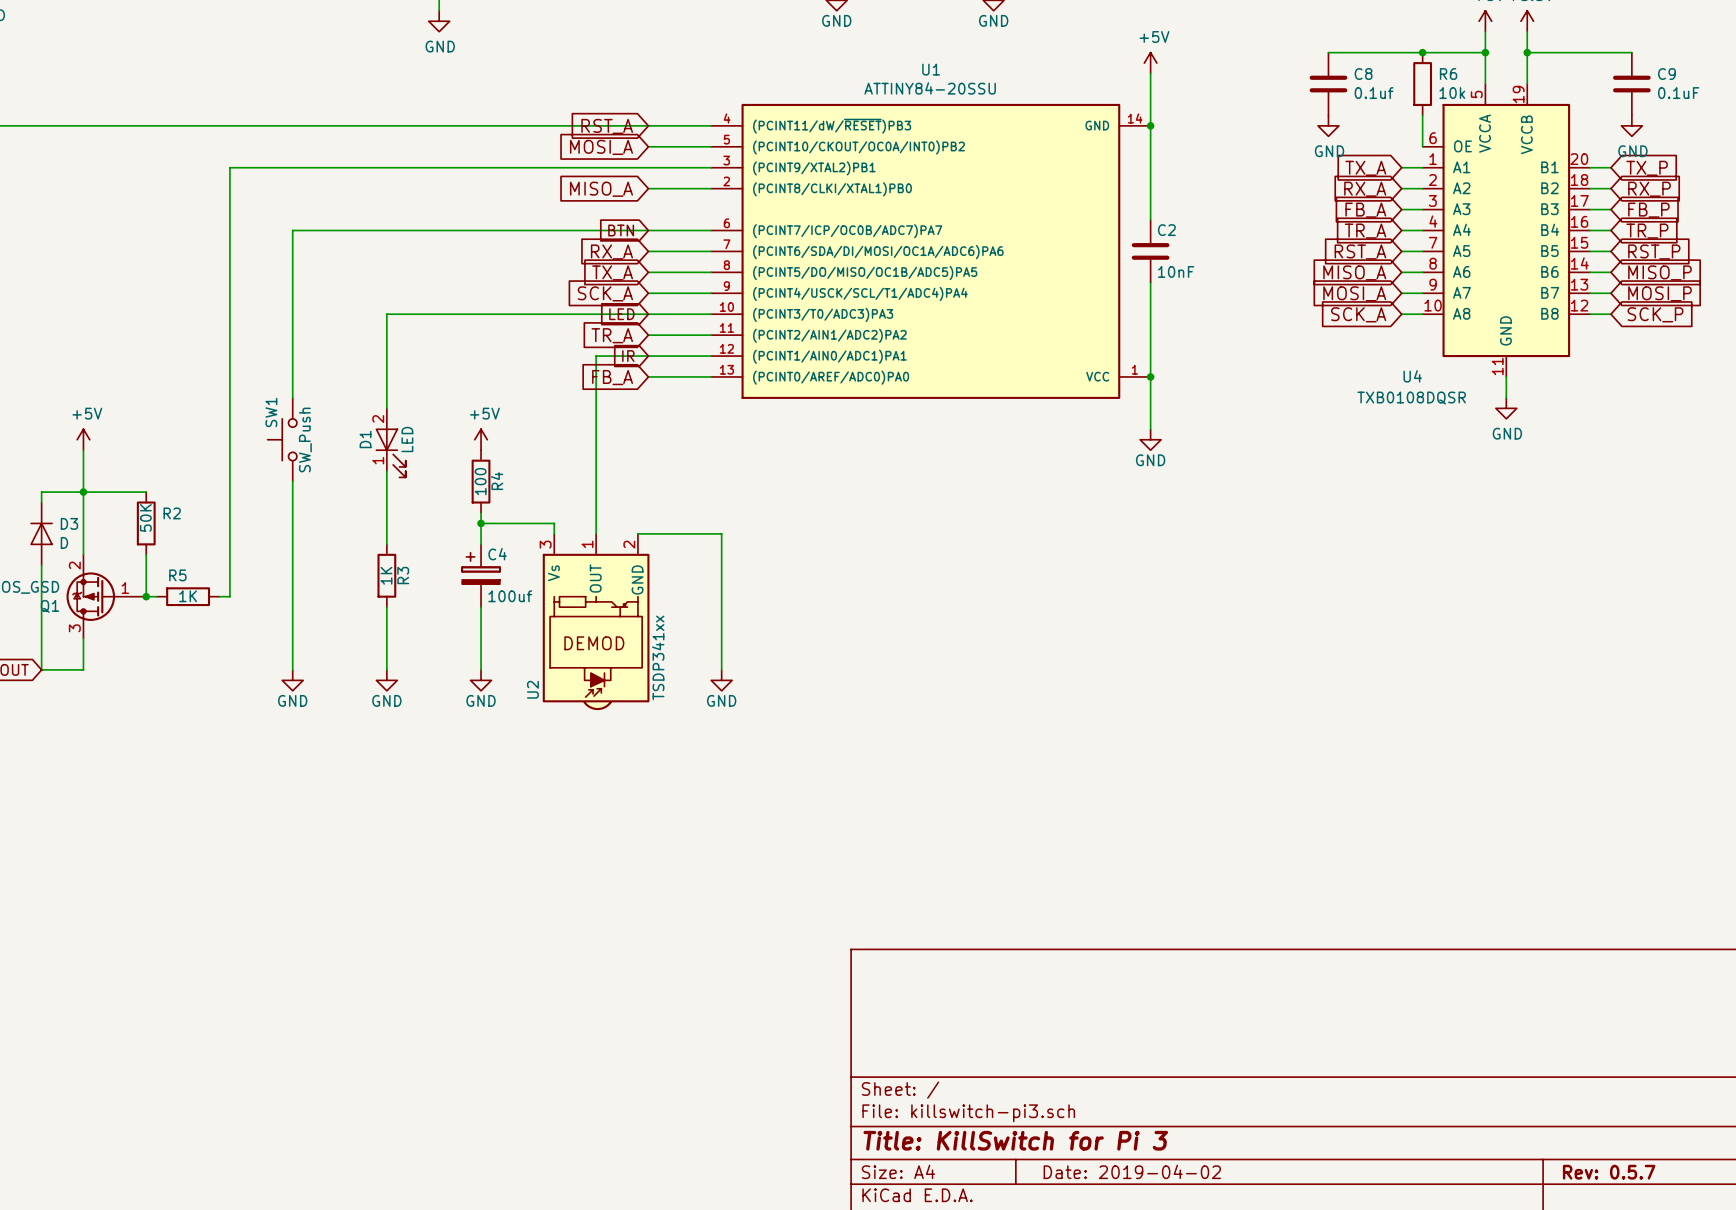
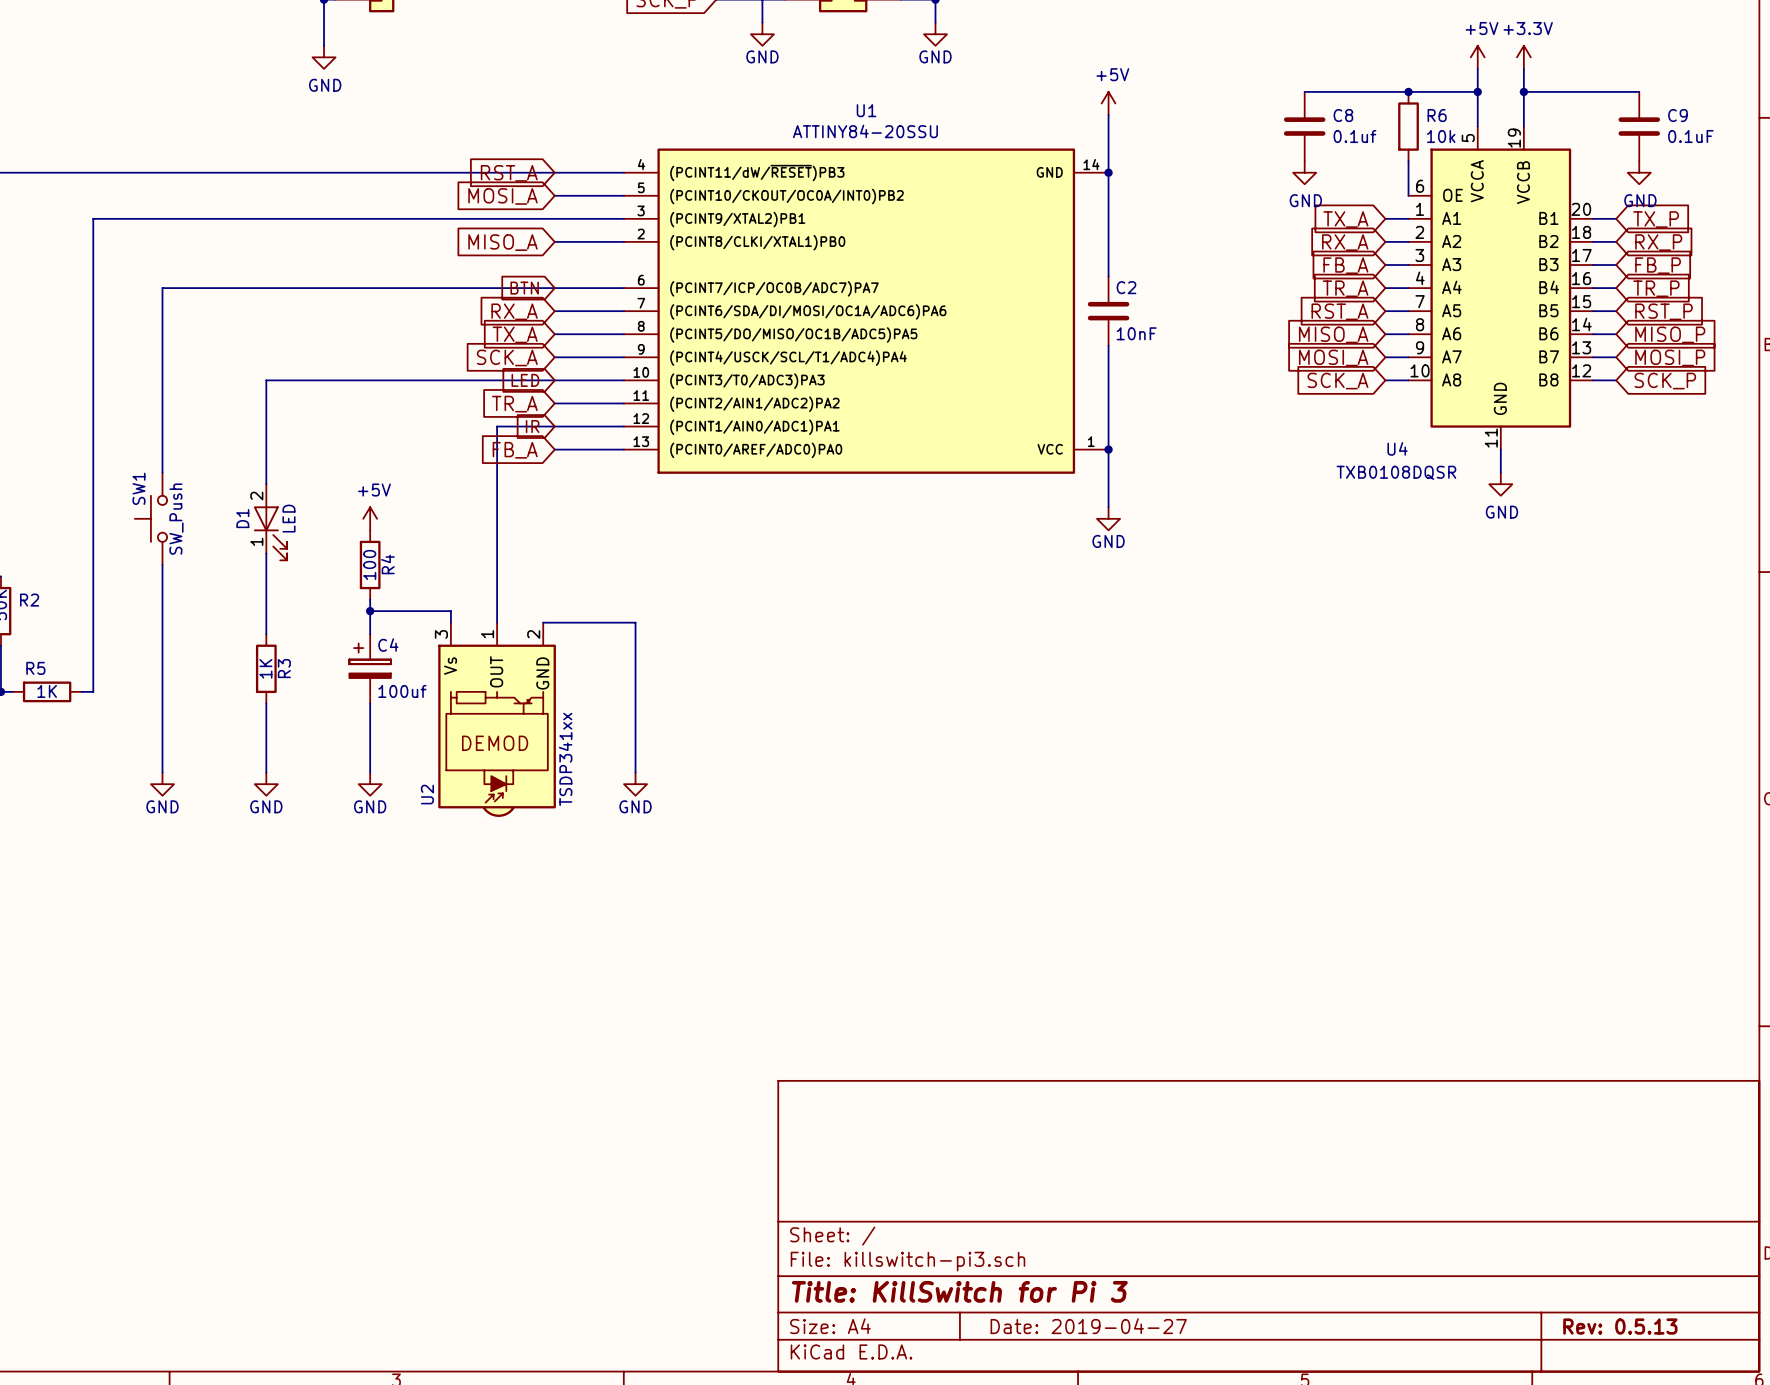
title block: Date: 2019-04-02 (1132, 1171) -> Date: 2019-04-27 (1088, 1326)
title block: Rev: 0.5.7 (1609, 1172) -> Rev: 0.5.13 (1620, 1326)

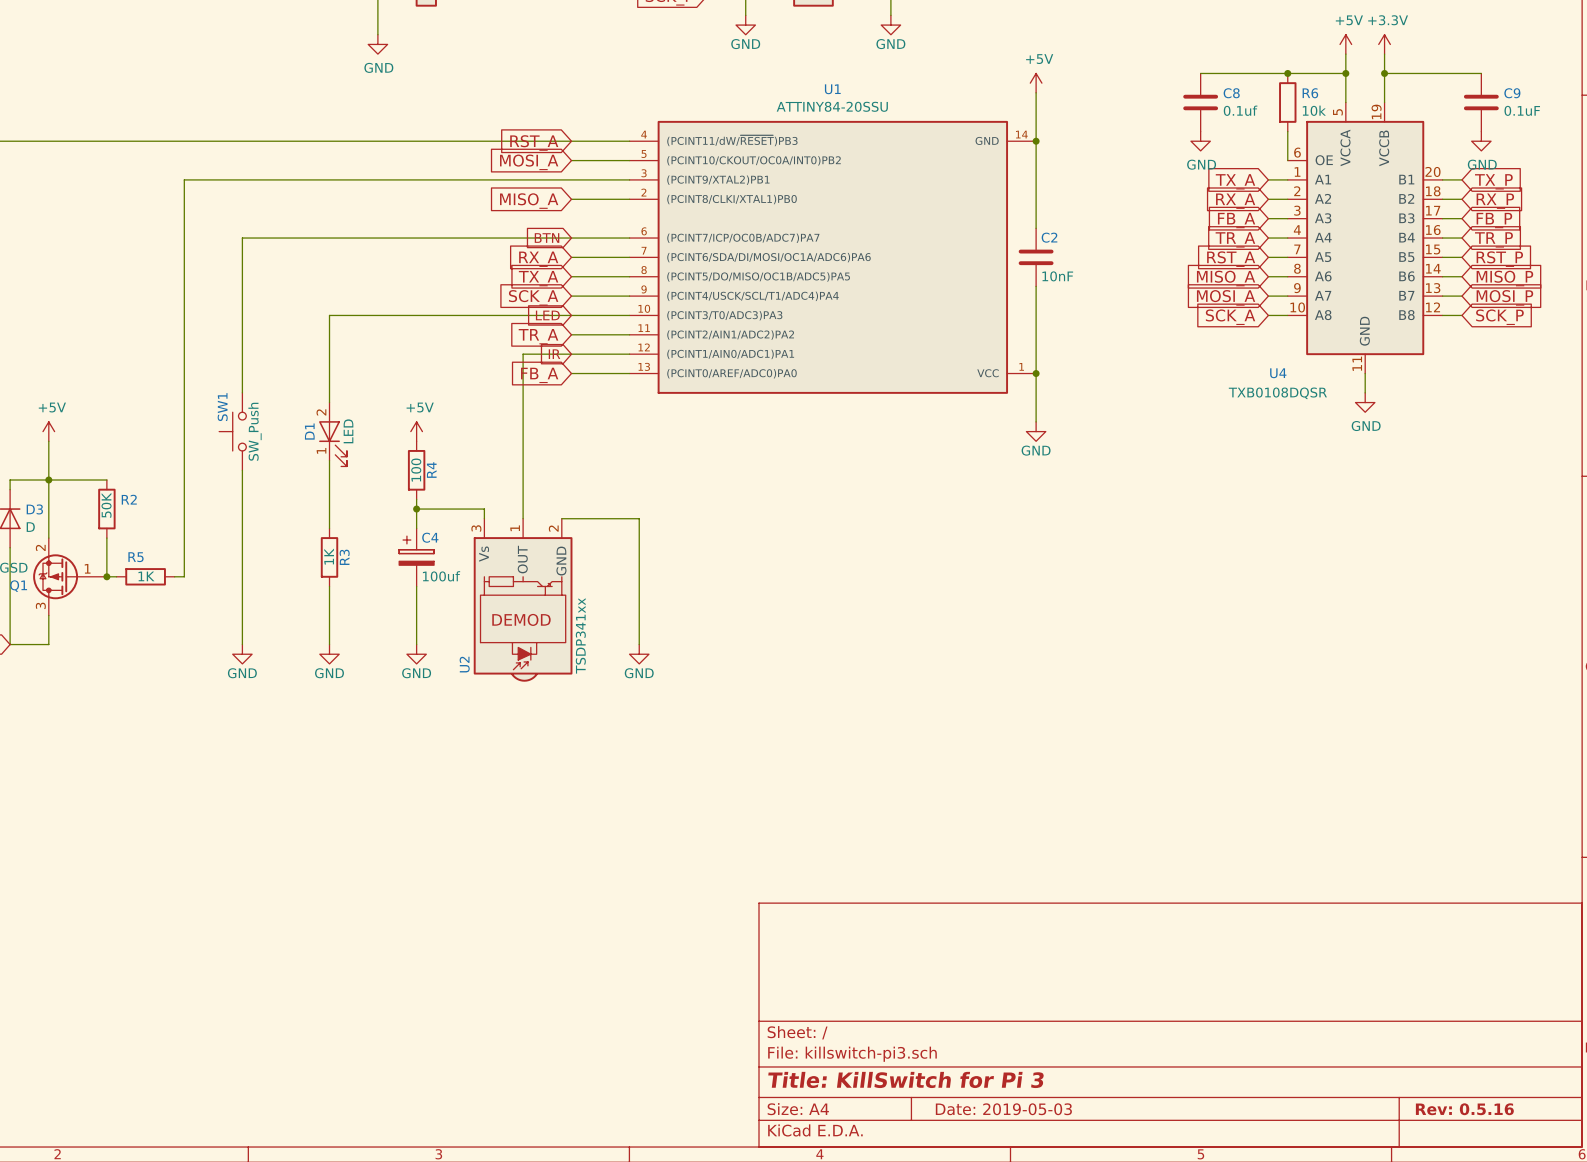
title block: Date: 2019-04-27 (1088, 1326) -> Date: 2019-05-03 (1003, 1109)
title block: Rev: 0.5.13 (1620, 1326) -> Rev: 0.5.16 (1464, 1109)

